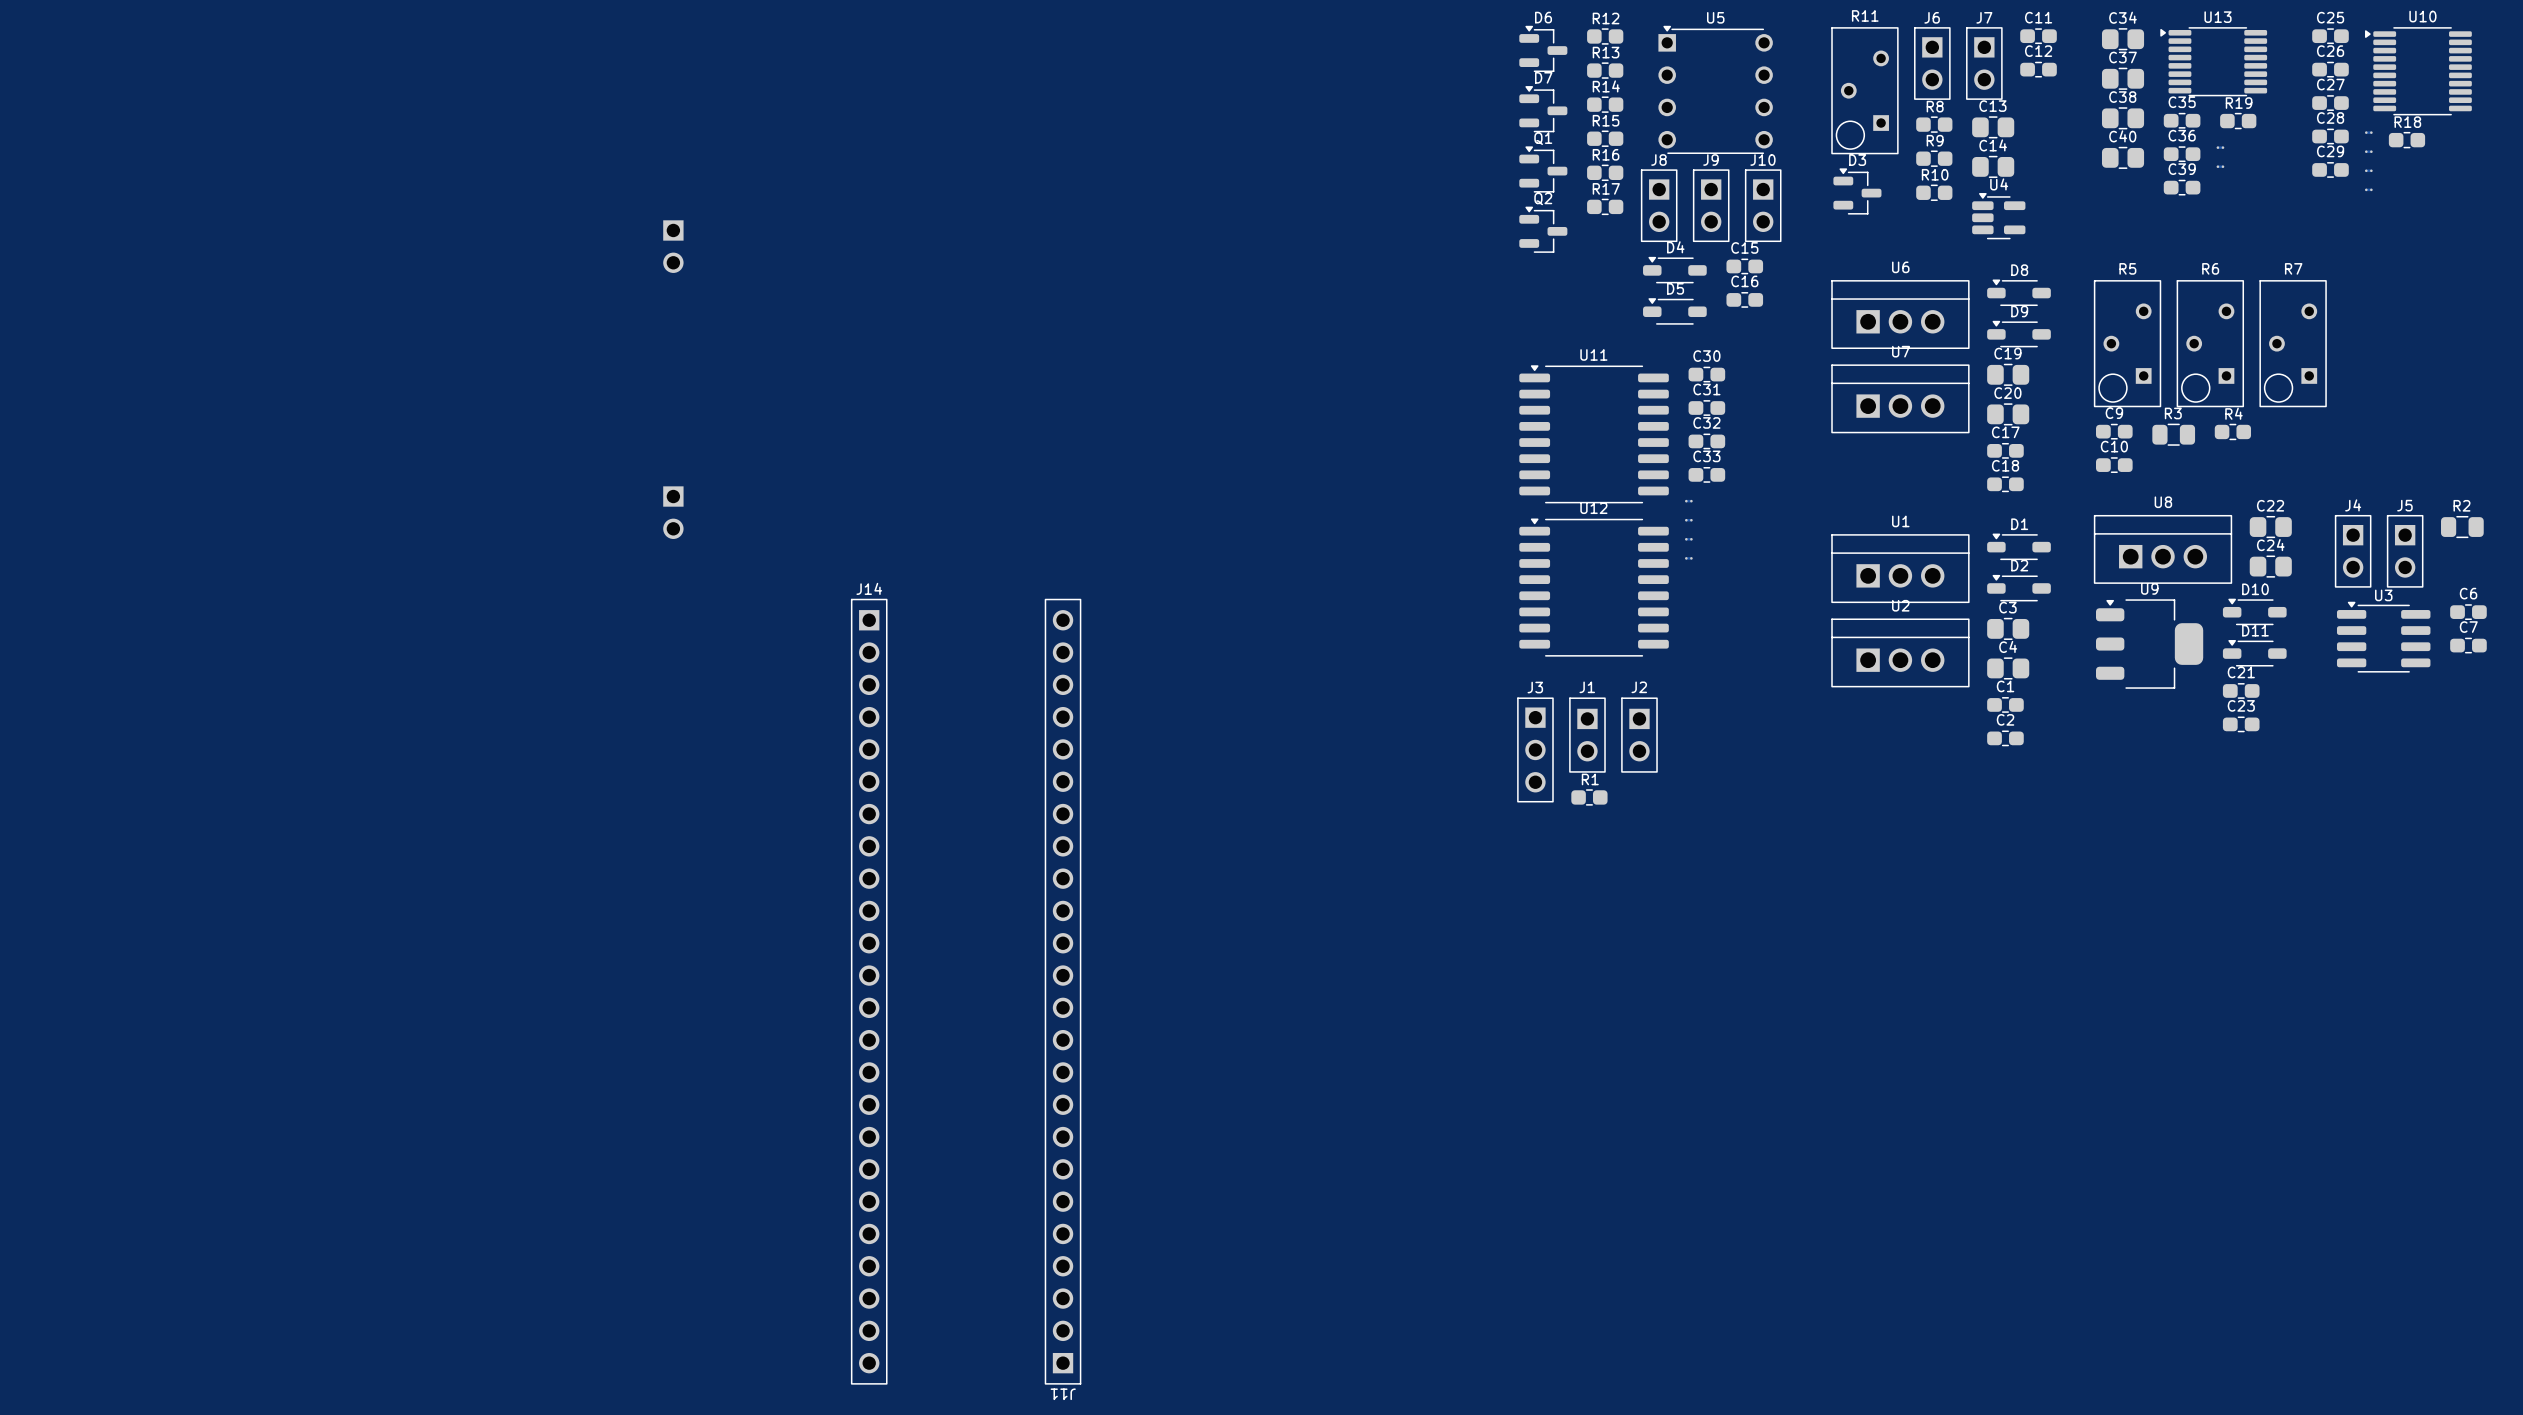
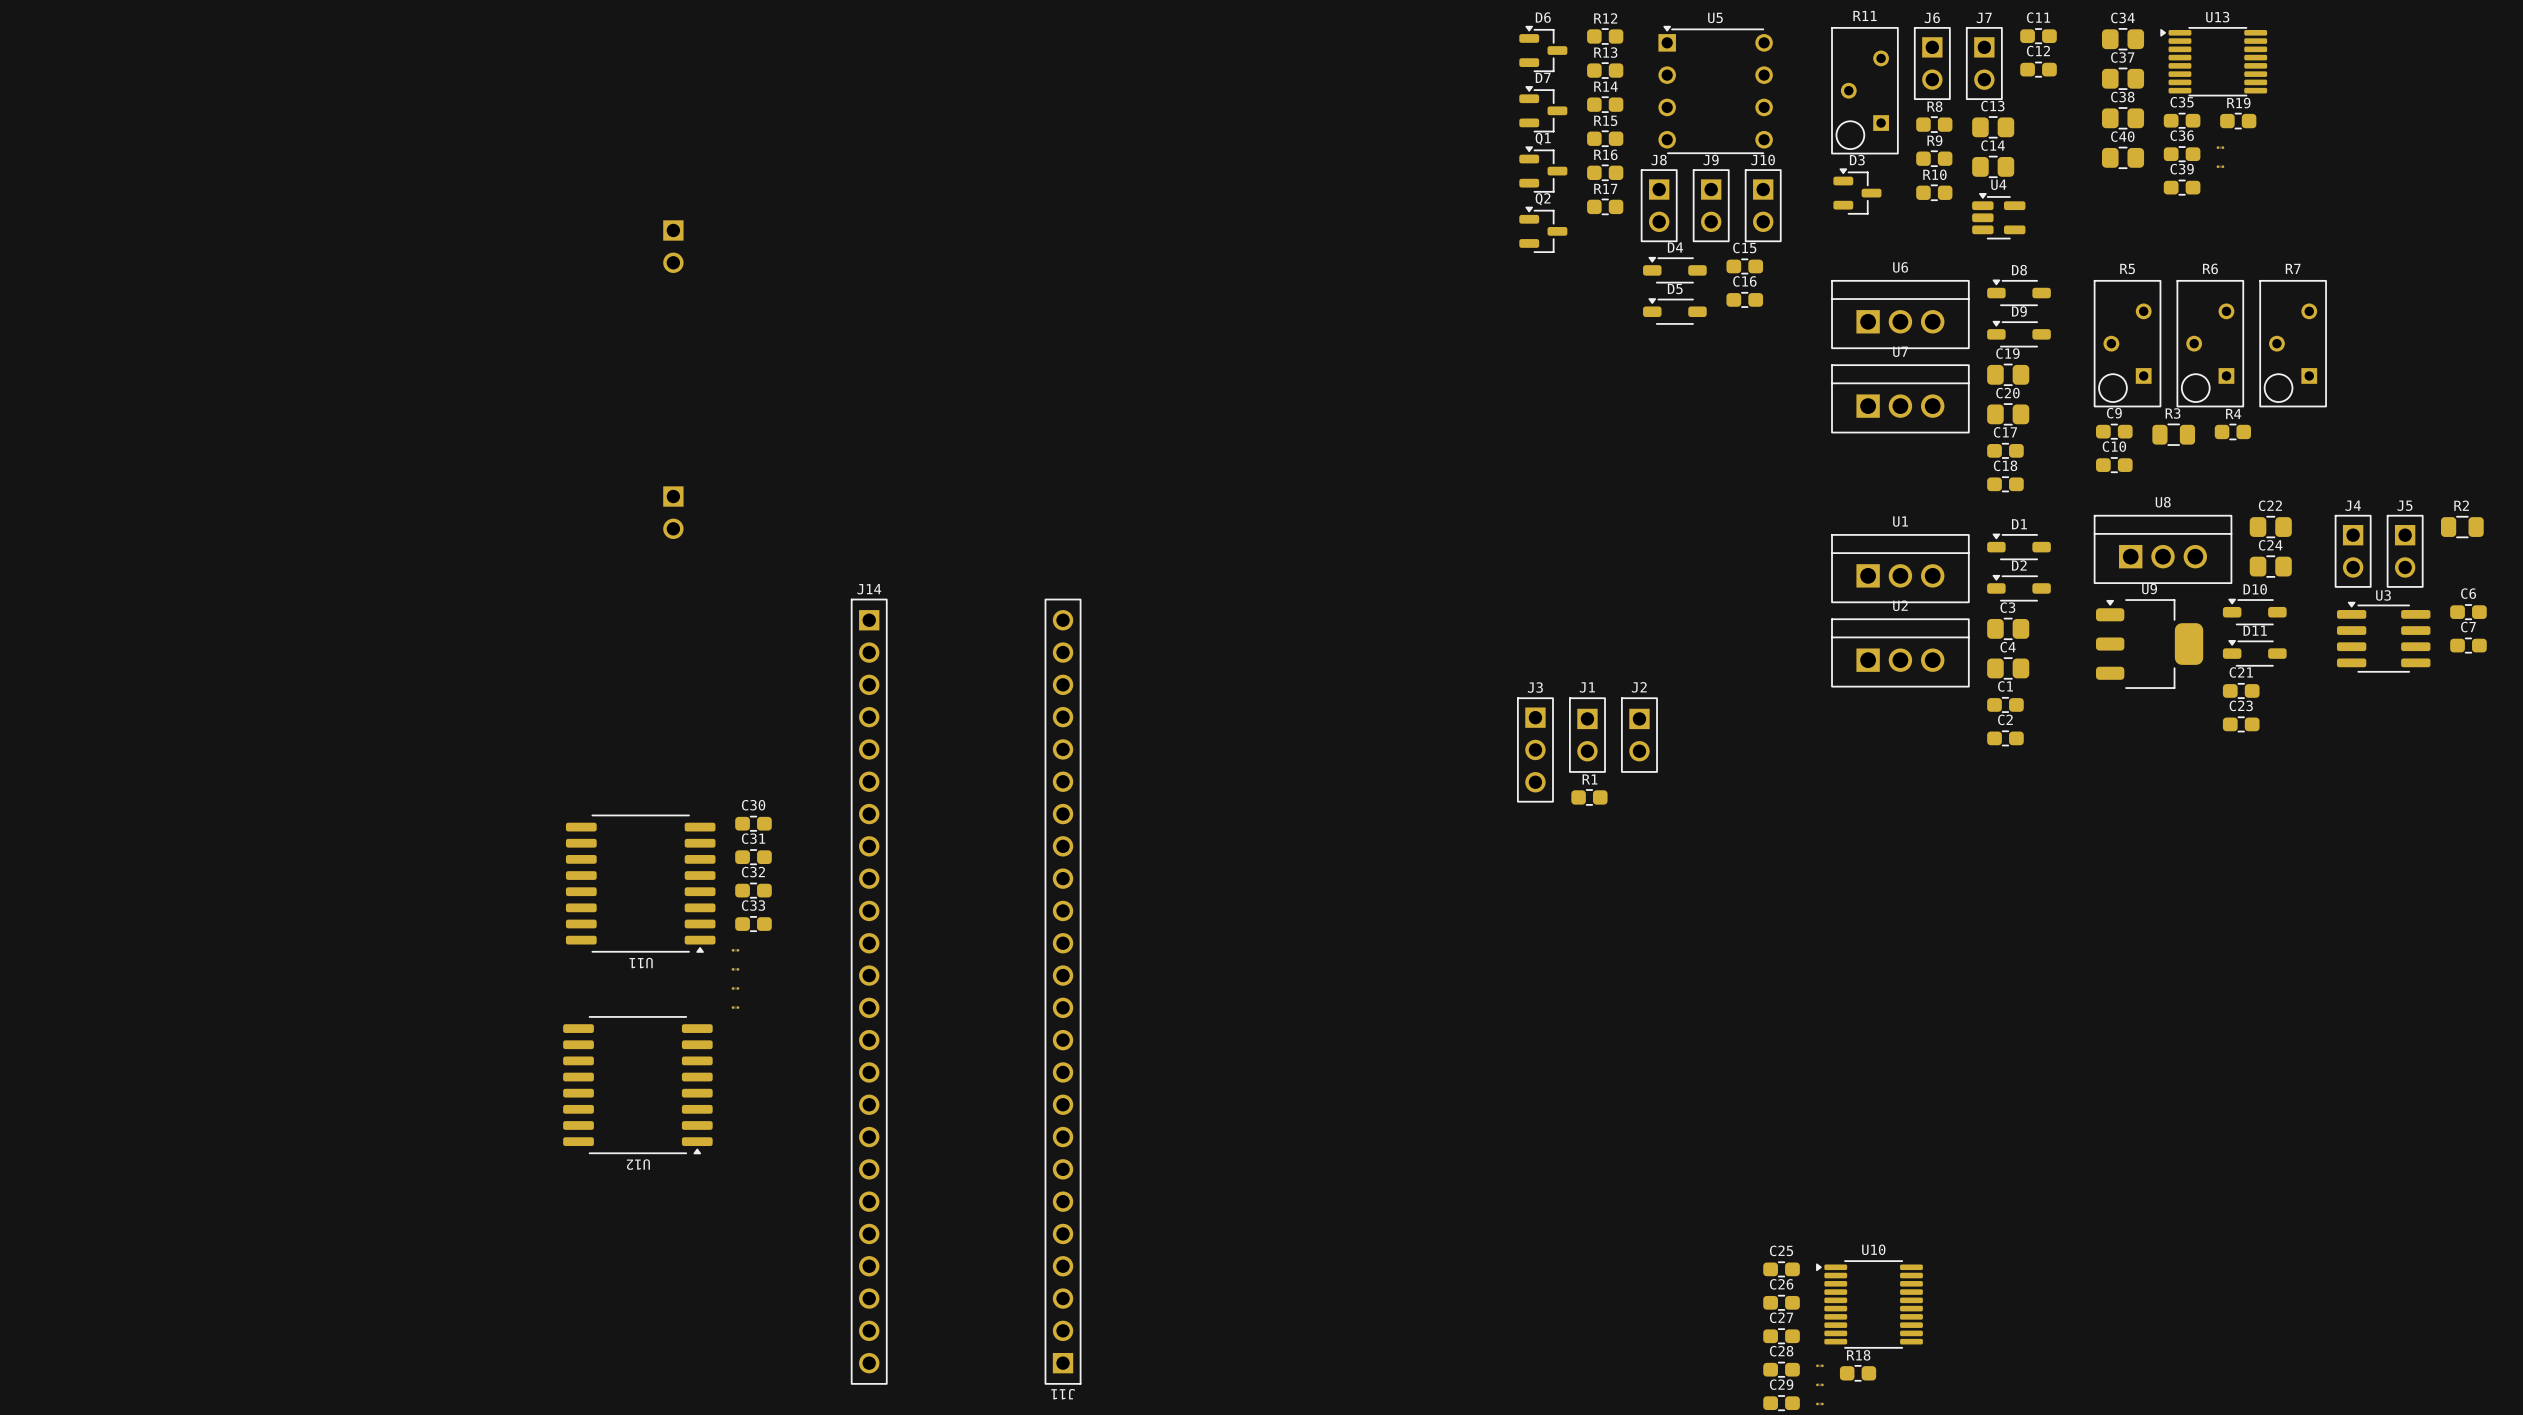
C25 position: (2330, 36) -> (1781, 1269)
C26 position: (2330, 69) -> (1781, 1302)
U10 position: (2418, 71) -> (1869, 1304)
C27 position: (2330, 103) -> (1781, 1336)
part: (2368, 132) -> none
C28 position: (2330, 136) -> (1781, 1369)
R18 position: (2406, 140) -> (1858, 1373)
part: (2368, 151) -> none
C29 position: (2330, 169) -> (1781, 1403)
part: (2368, 170) -> none
part: (2368, 189) -> none
C30 position: (1706, 374) -> (753, 823)
C31 position: (1706, 408) -> (753, 857)
U11 rotation: 0° (1594, 434) -> 180° (640, 883)
U11 position: (1594, 434) -> (640, 883)
C32 position: (1706, 441) -> (753, 890)
C33 position: (1706, 474) -> (753, 924)
part: (1688, 501) -> none
part: (1688, 520) -> none
part: (1688, 539) -> none
part: (1688, 558) -> none
U12 rotation: 0° (1594, 587) -> 180° (637, 1085)
U12 position: (1594, 587) -> (637, 1085)
part: none -> (735, 950)
part: none -> (735, 969)
part: none -> (735, 988)
part: none -> (735, 1007)
part: none -> (1819, 1365)
part: none -> (1819, 1384)
part: none -> (1819, 1403)

